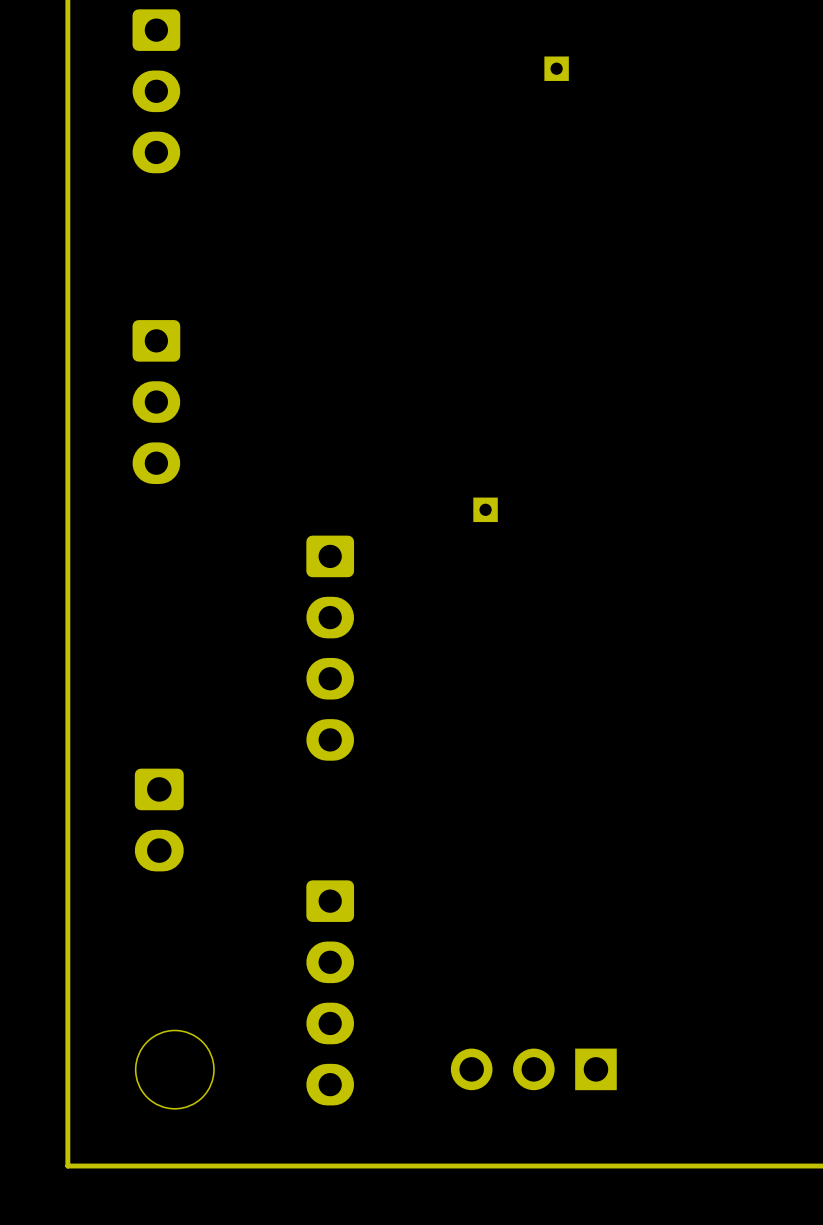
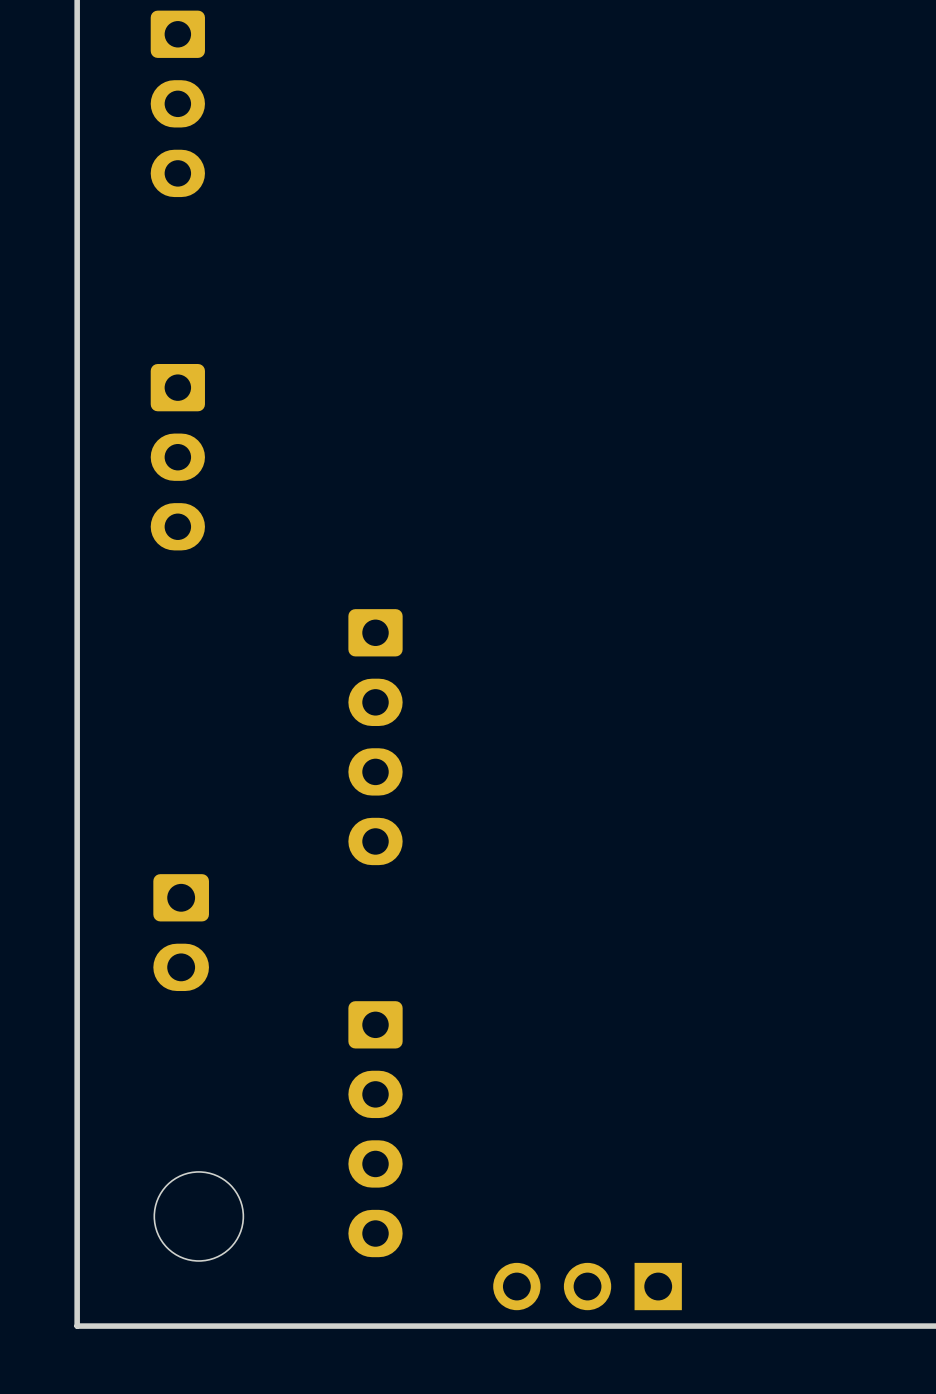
part: (556, 68) -> none
part: (485, 509) -> none
part position: (533, 1069) -> (587, 1286)

